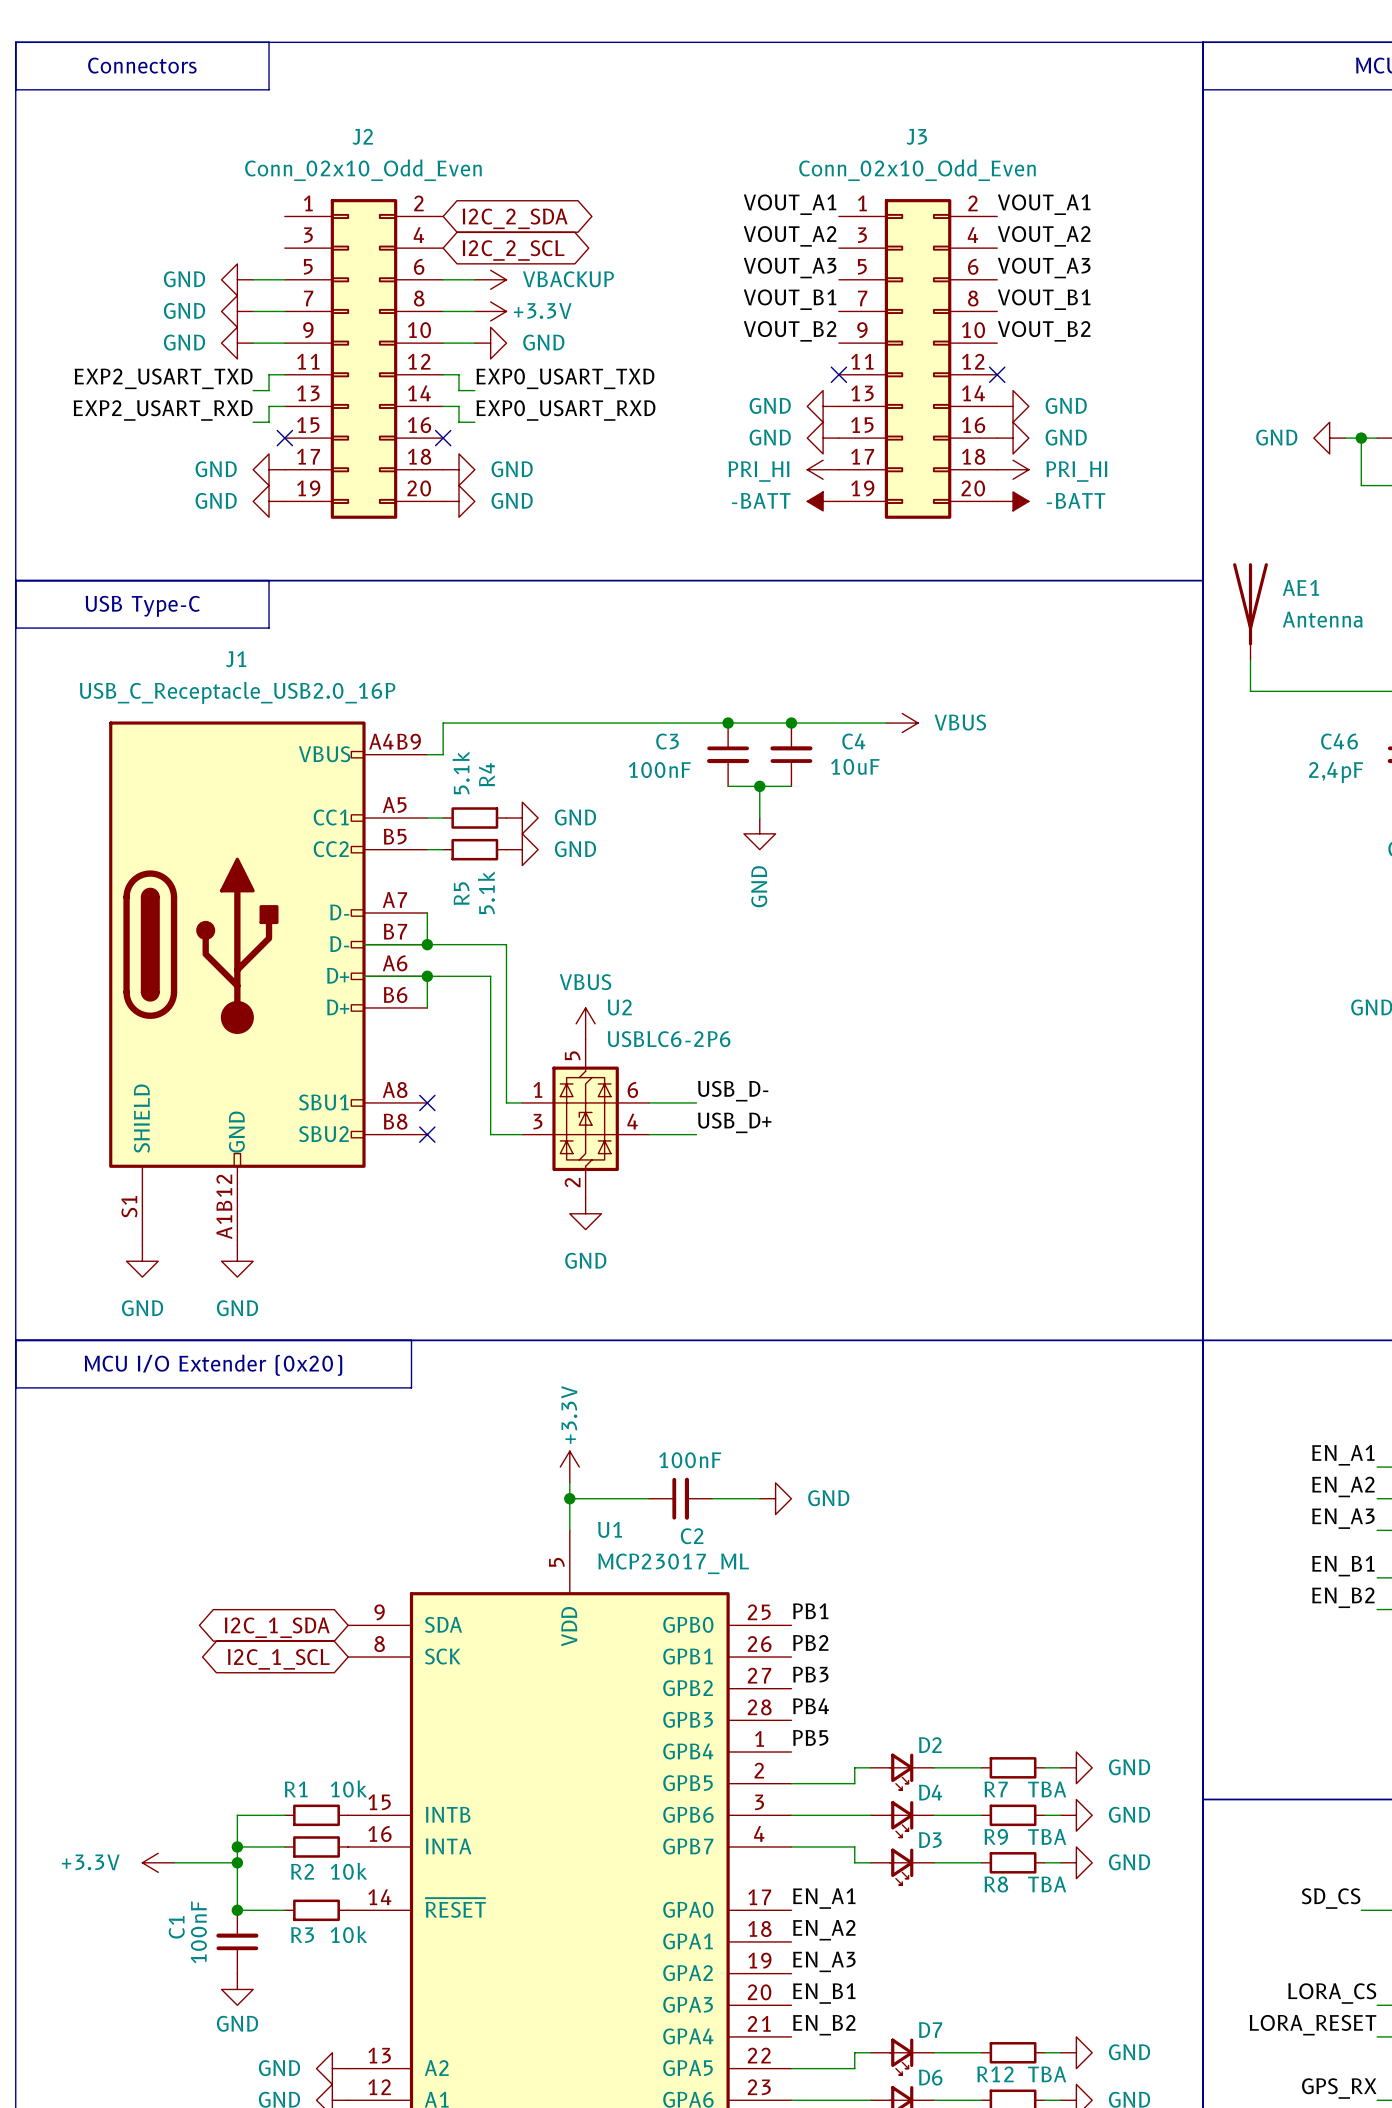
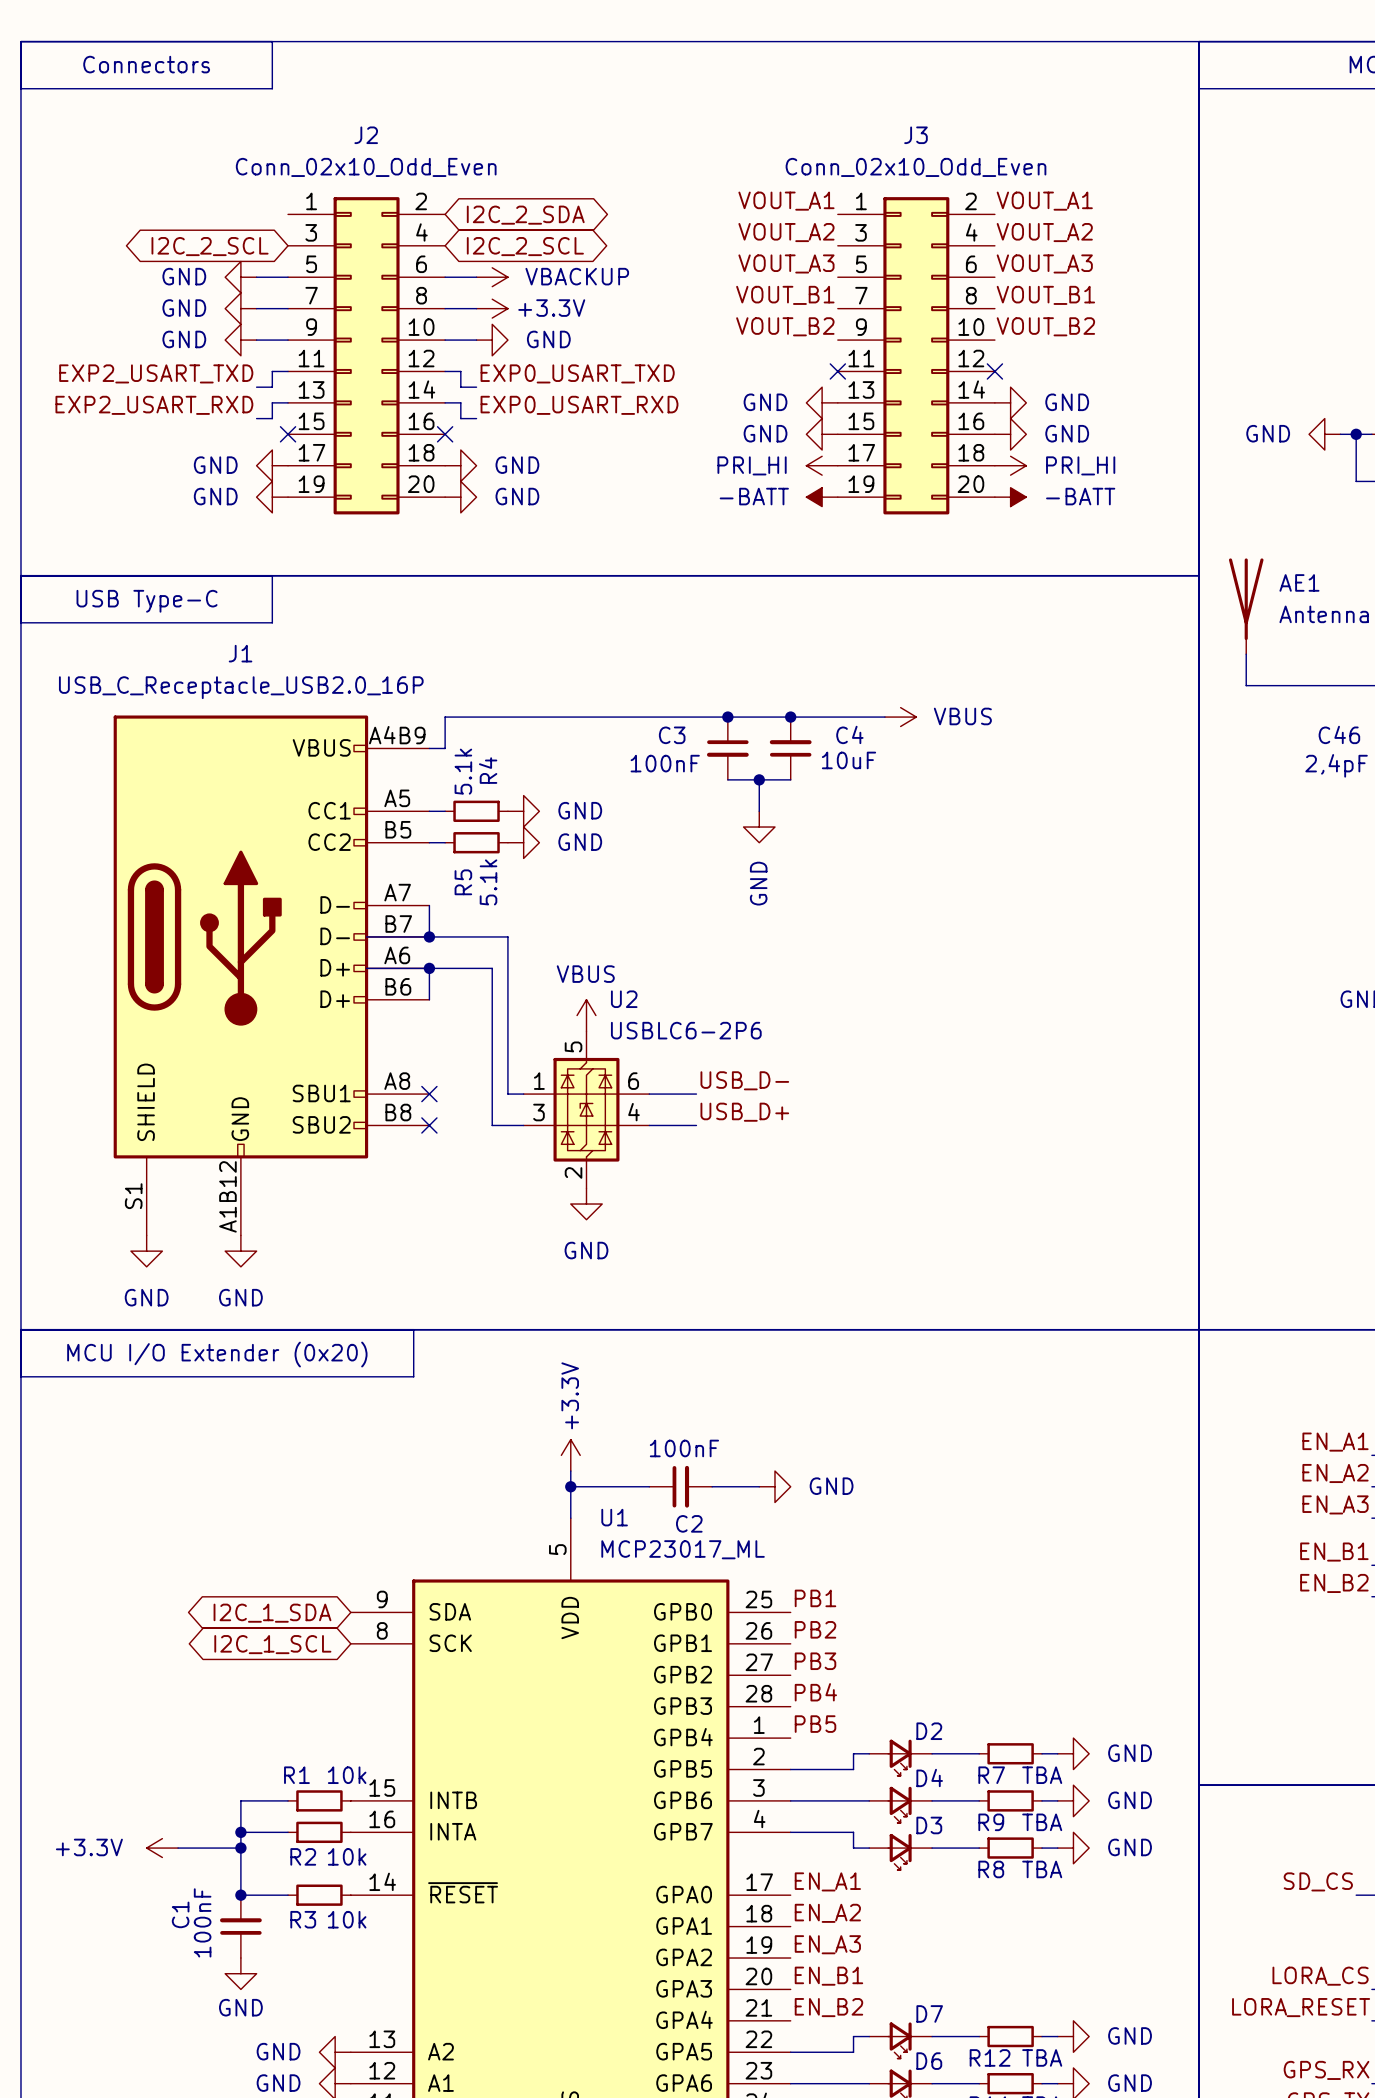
global label: none -> I2C_2_SCL (210, 246)

